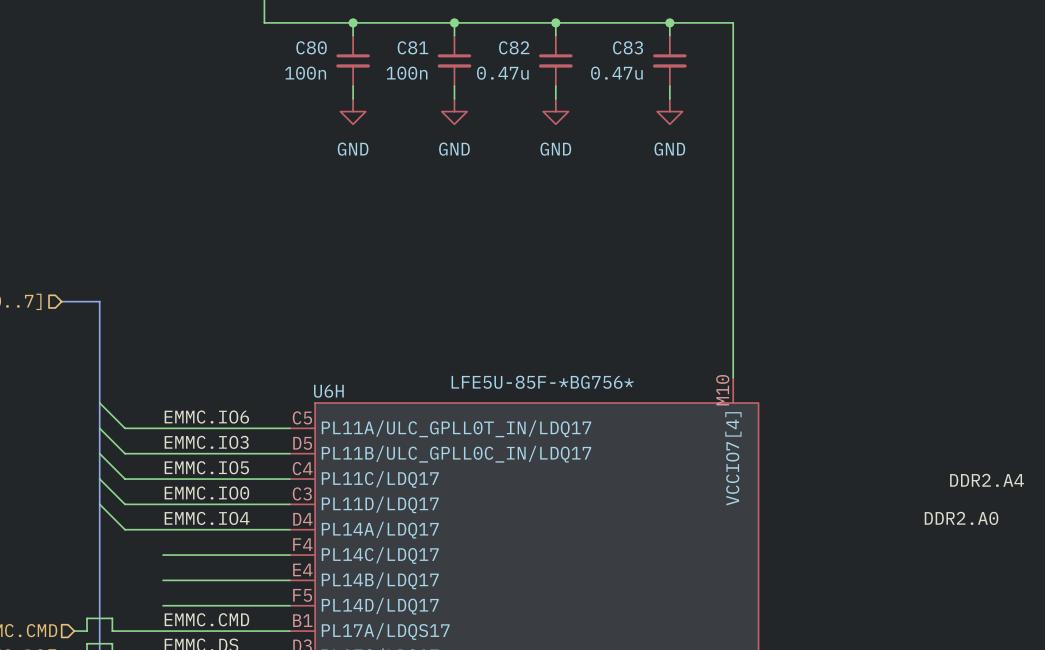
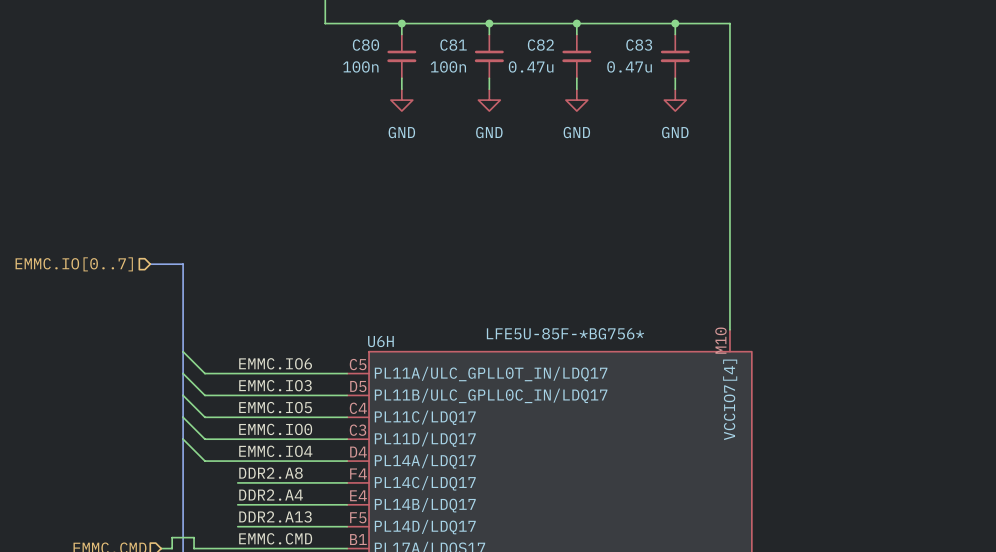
label: DDR2.A4 (987, 480) -> none
label: DDR2.A0 (961, 518) -> none
label: none -> DDR2.A8 (271, 473)
label: none -> DDR2.A4 (271, 495)
label: none -> DDR2.A13 (275, 516)

